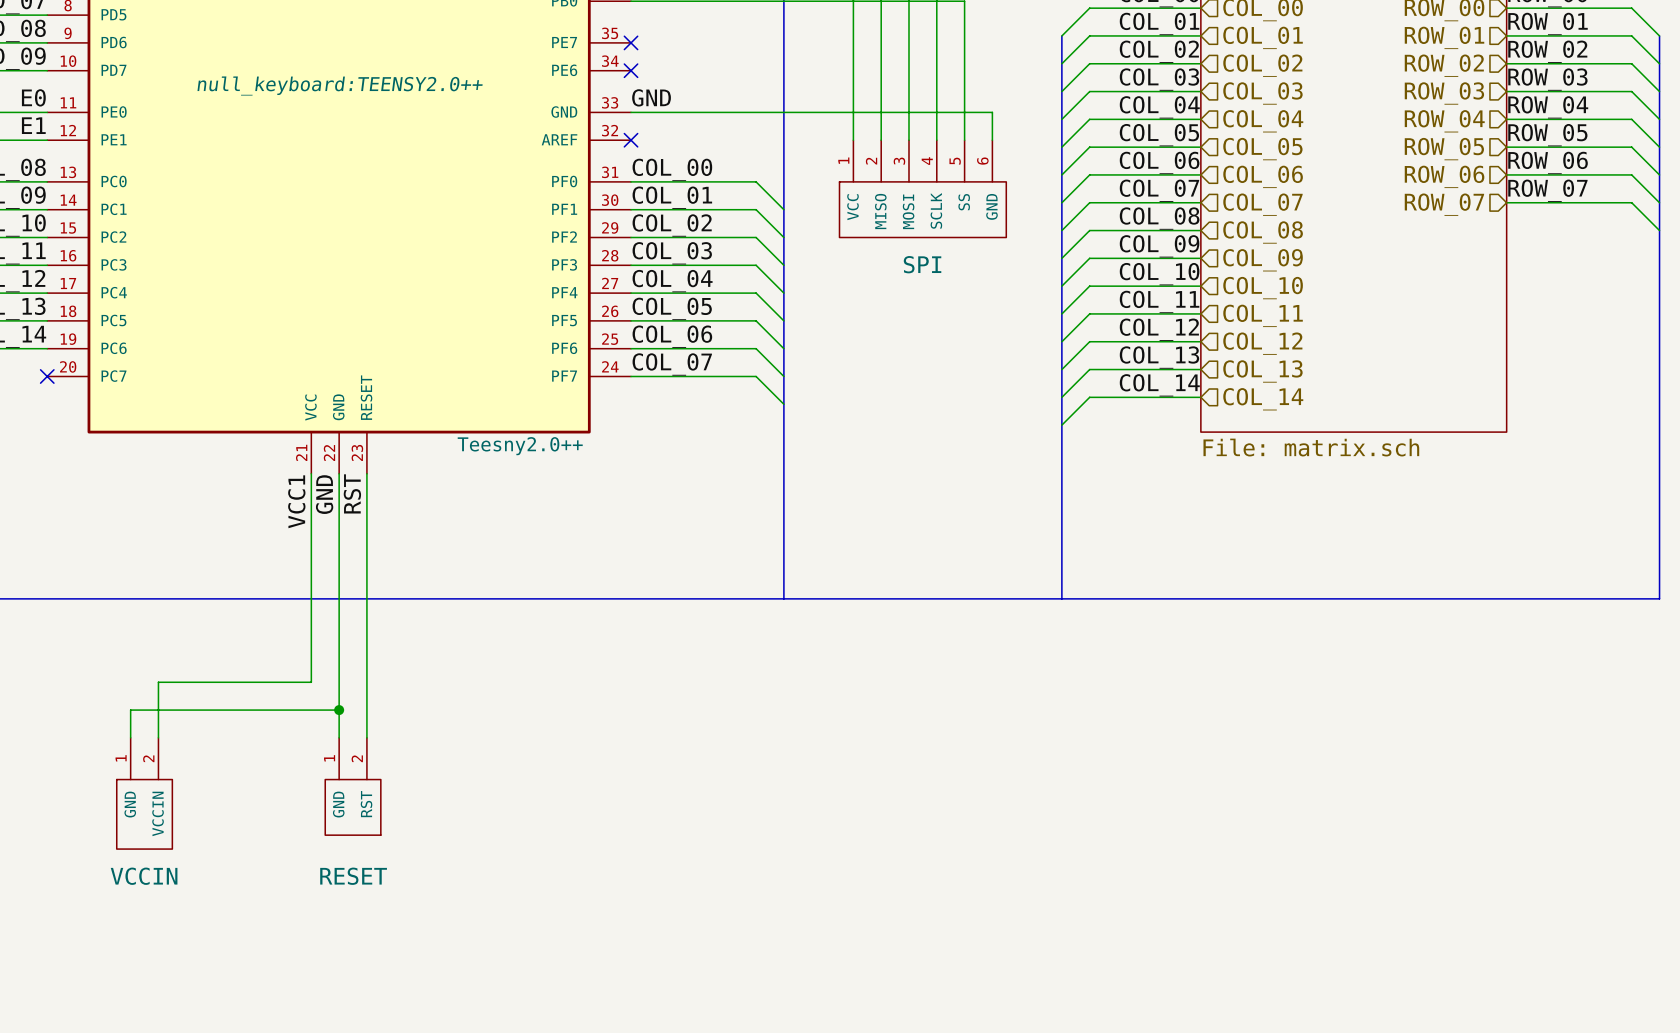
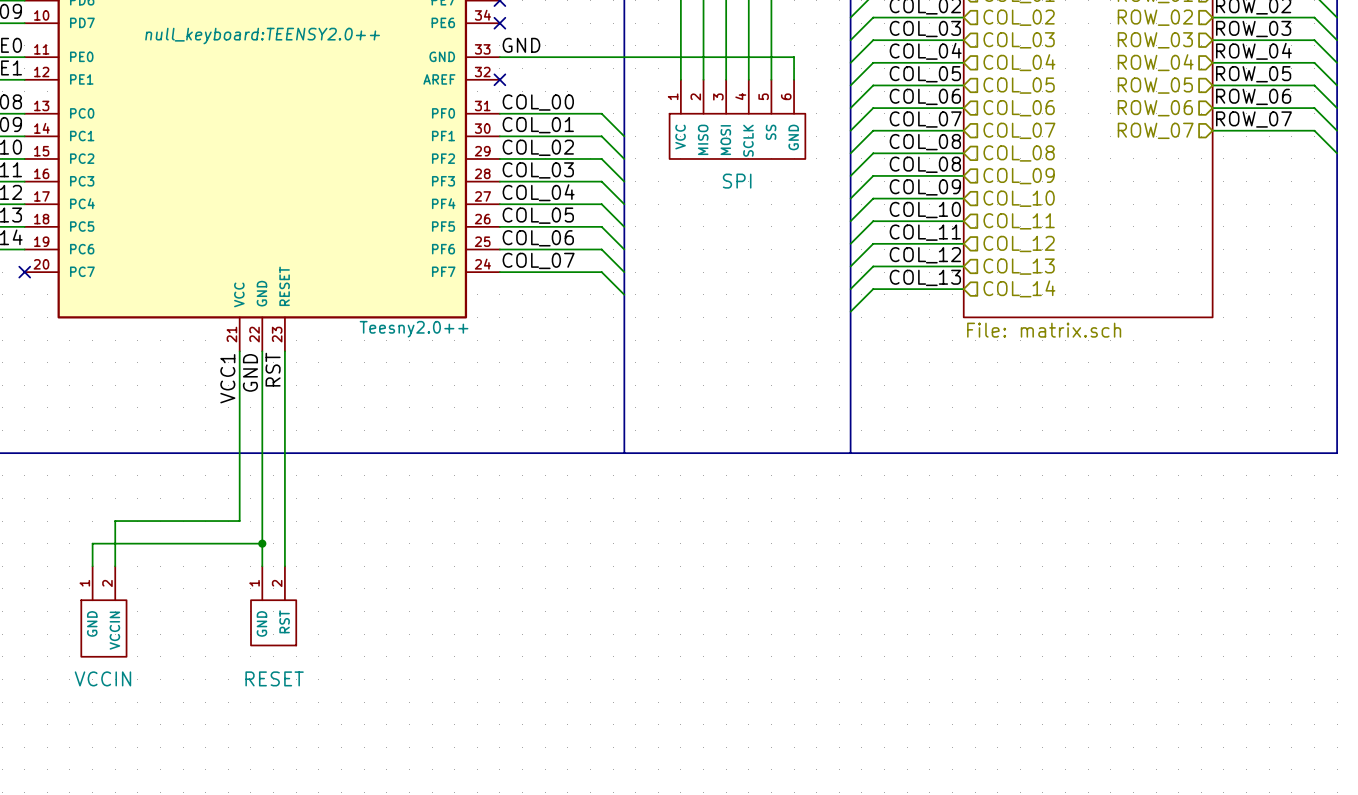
label: COL_09 (1159, 246) -> COL_08 (925, 164)
label: COL_10 (1159, 274) -> COL_09 (925, 187)
label: COL_11 (1159, 301) -> COL_10 (925, 210)
label: COL_12 (1159, 329) -> COL_11 (925, 232)
label: COL_13 (1159, 357) -> COL_12 (925, 255)
label: COL_14 (1159, 385) -> COL_13 (925, 277)

